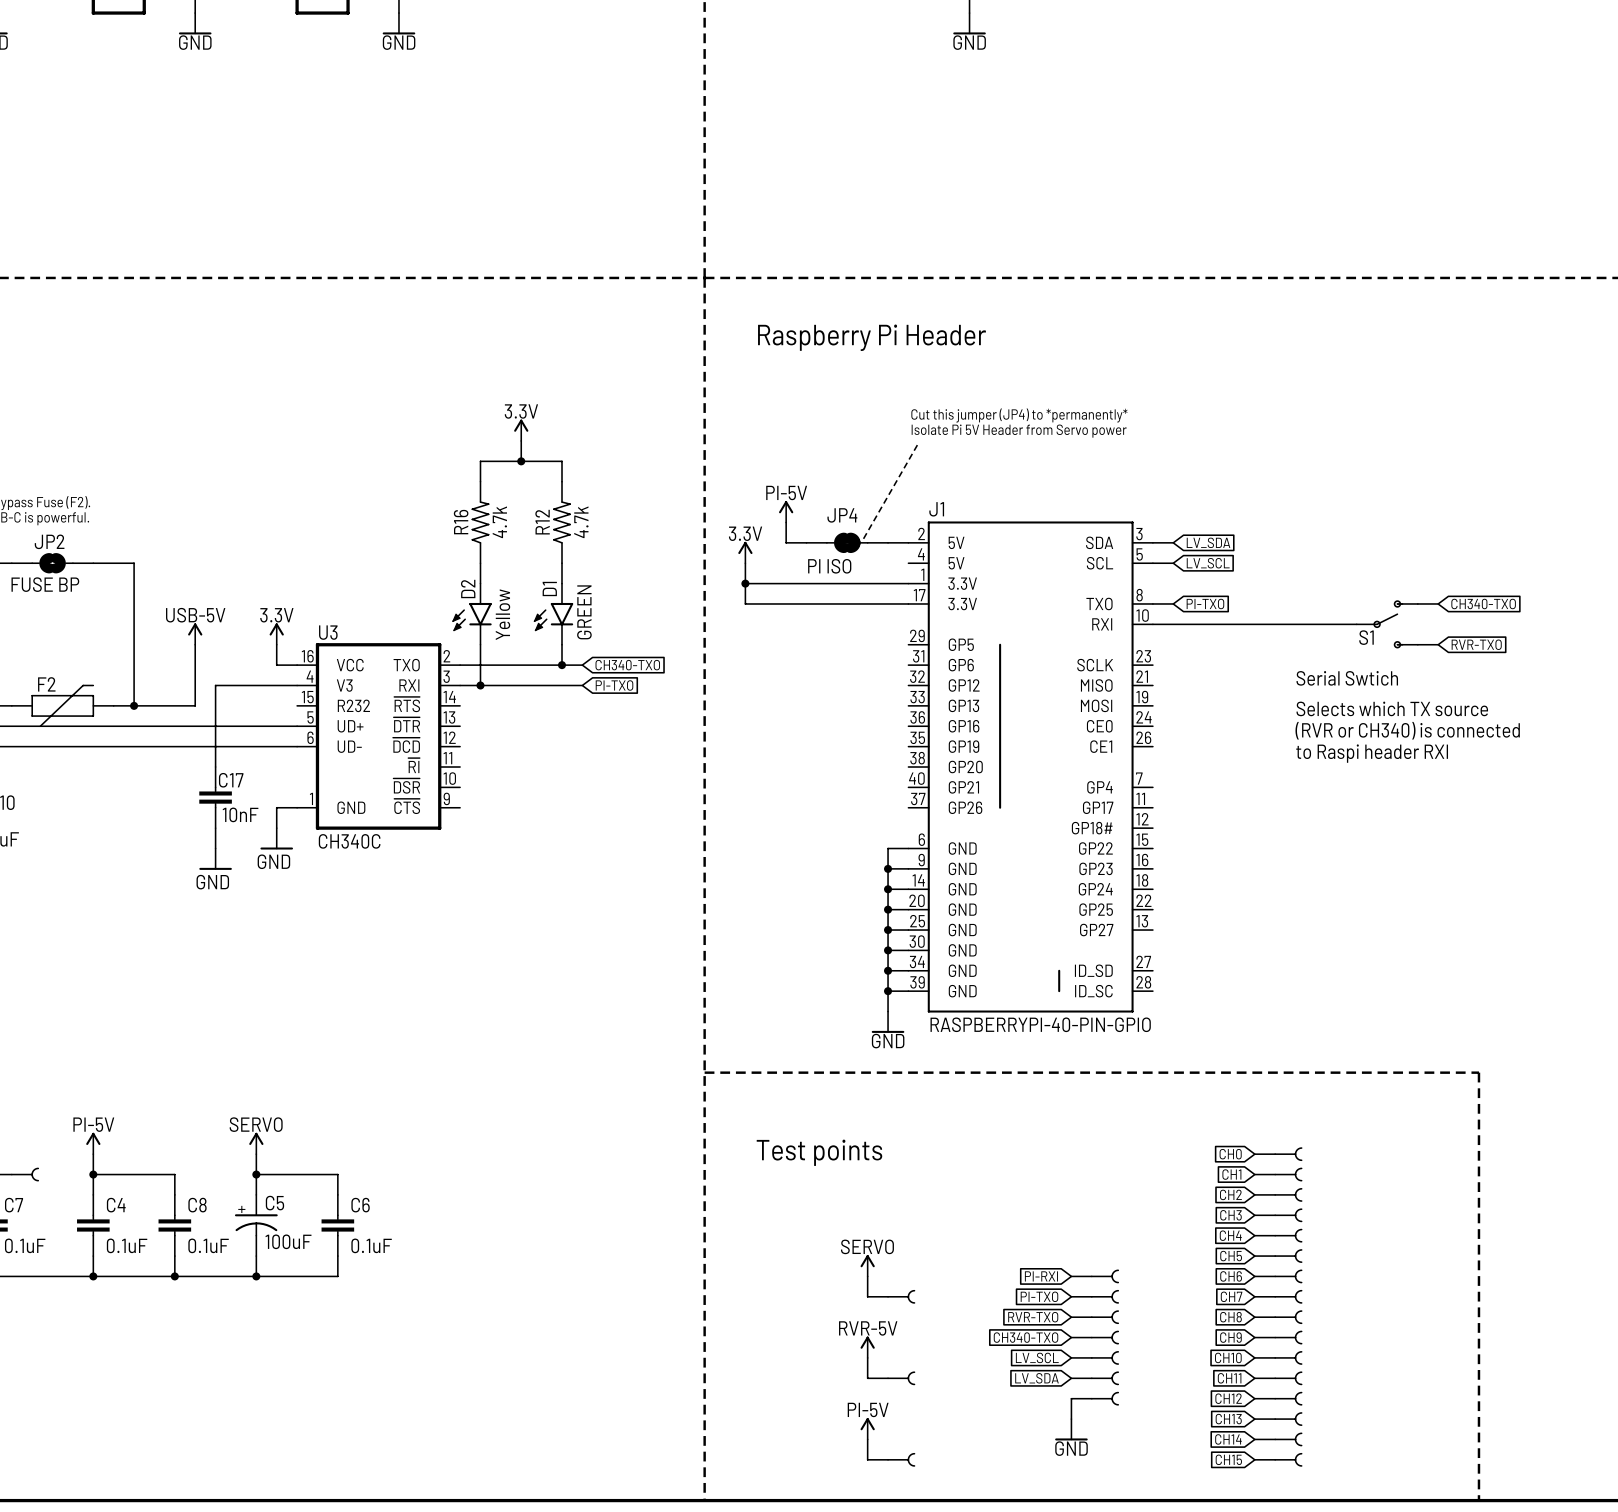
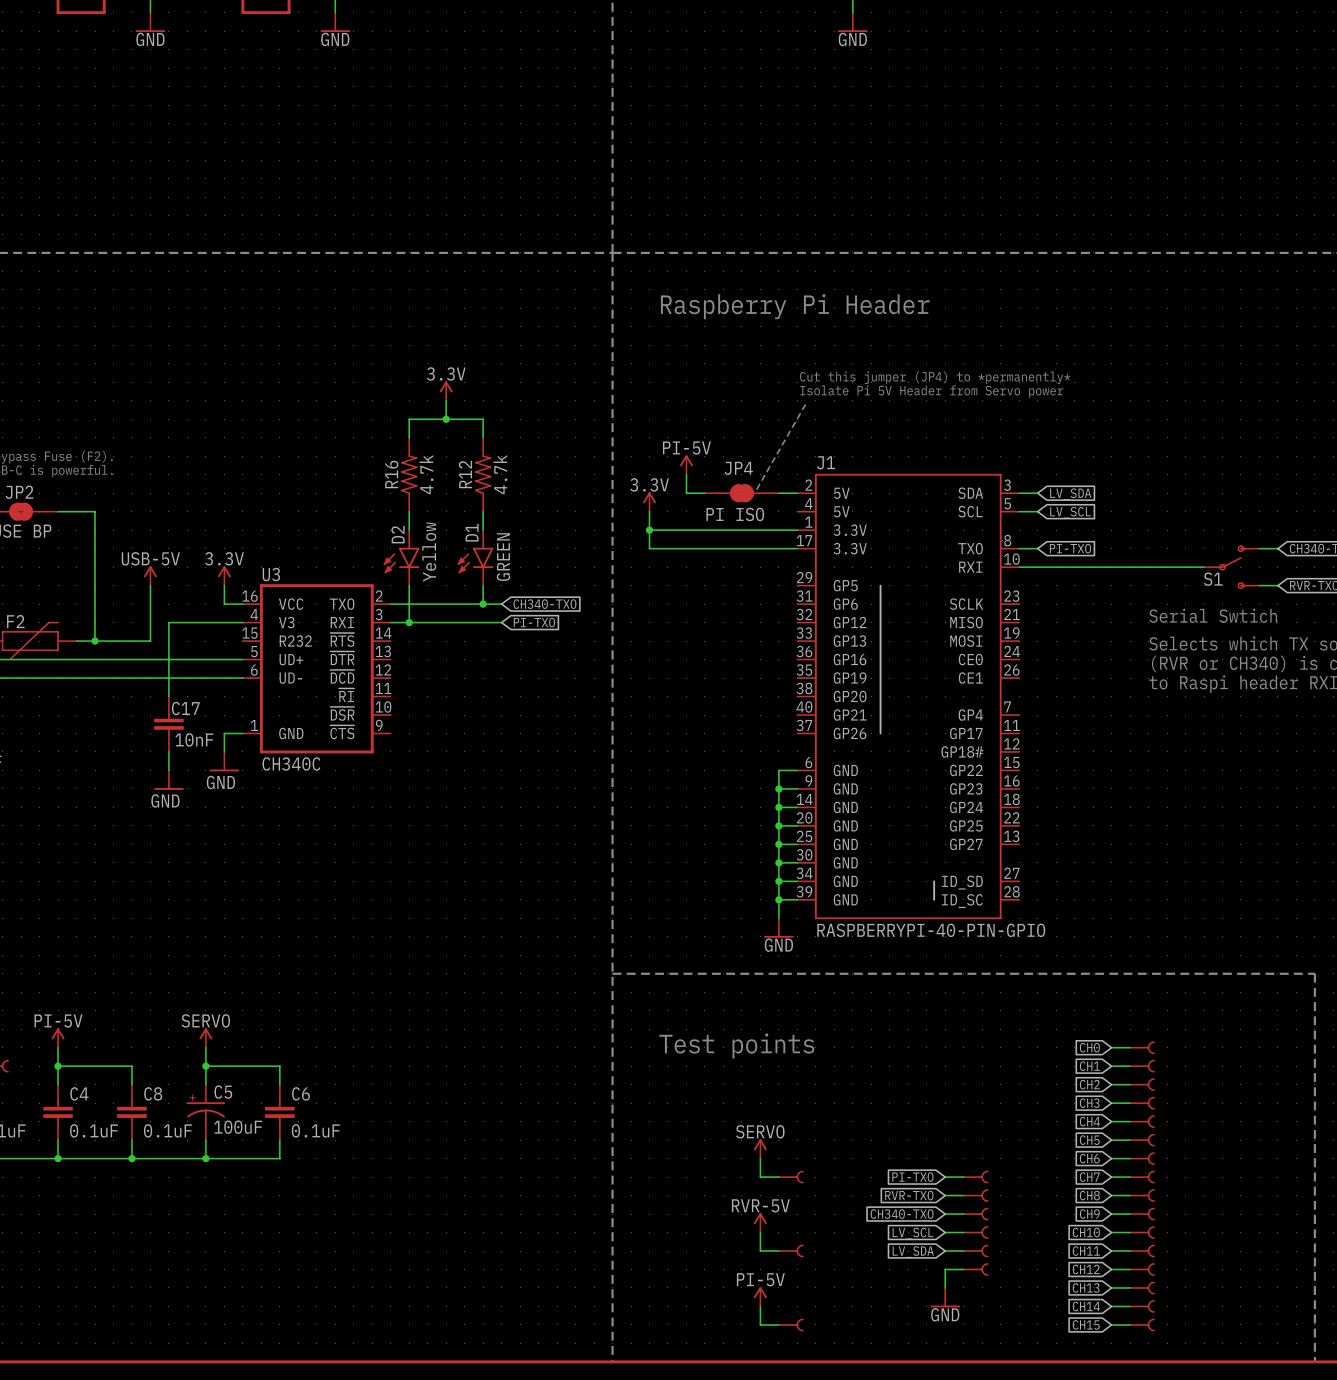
global label: PI-RXI (1041, 1276) -> none
wire: (1071, 1276) (1091, 1276) -> none
part: (1105, 1276) -> none

